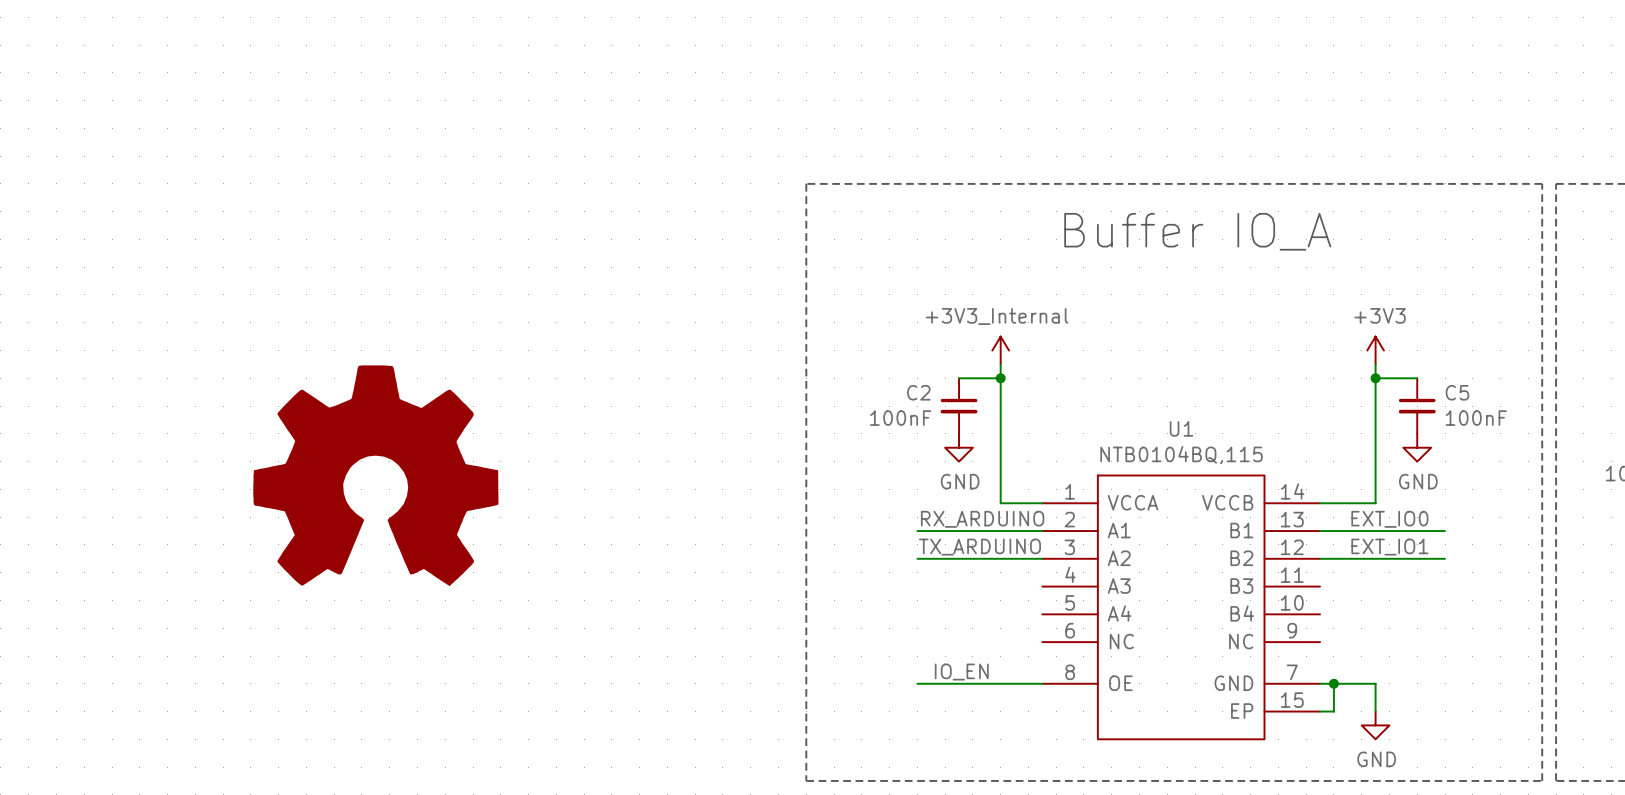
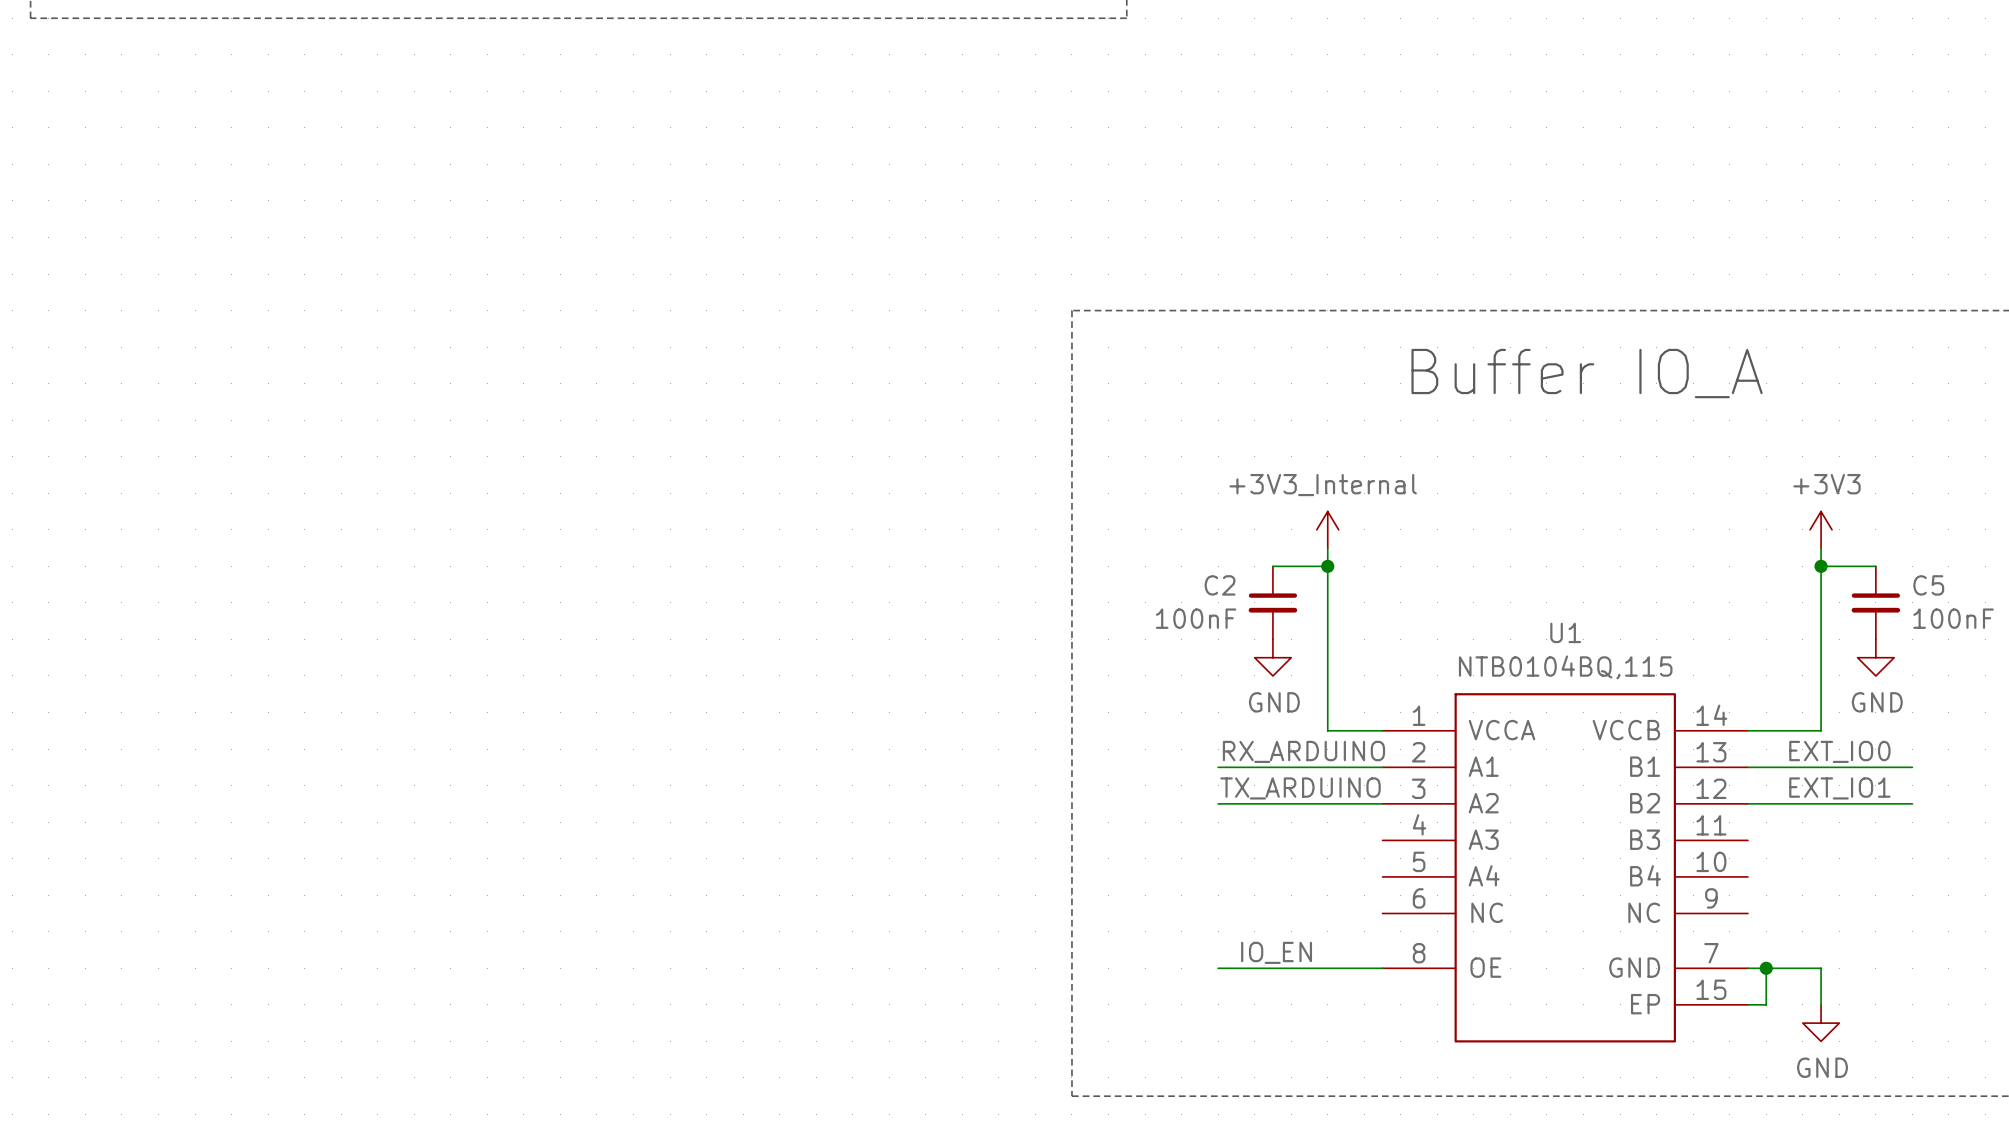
power symbol: (375, 475) -> none

